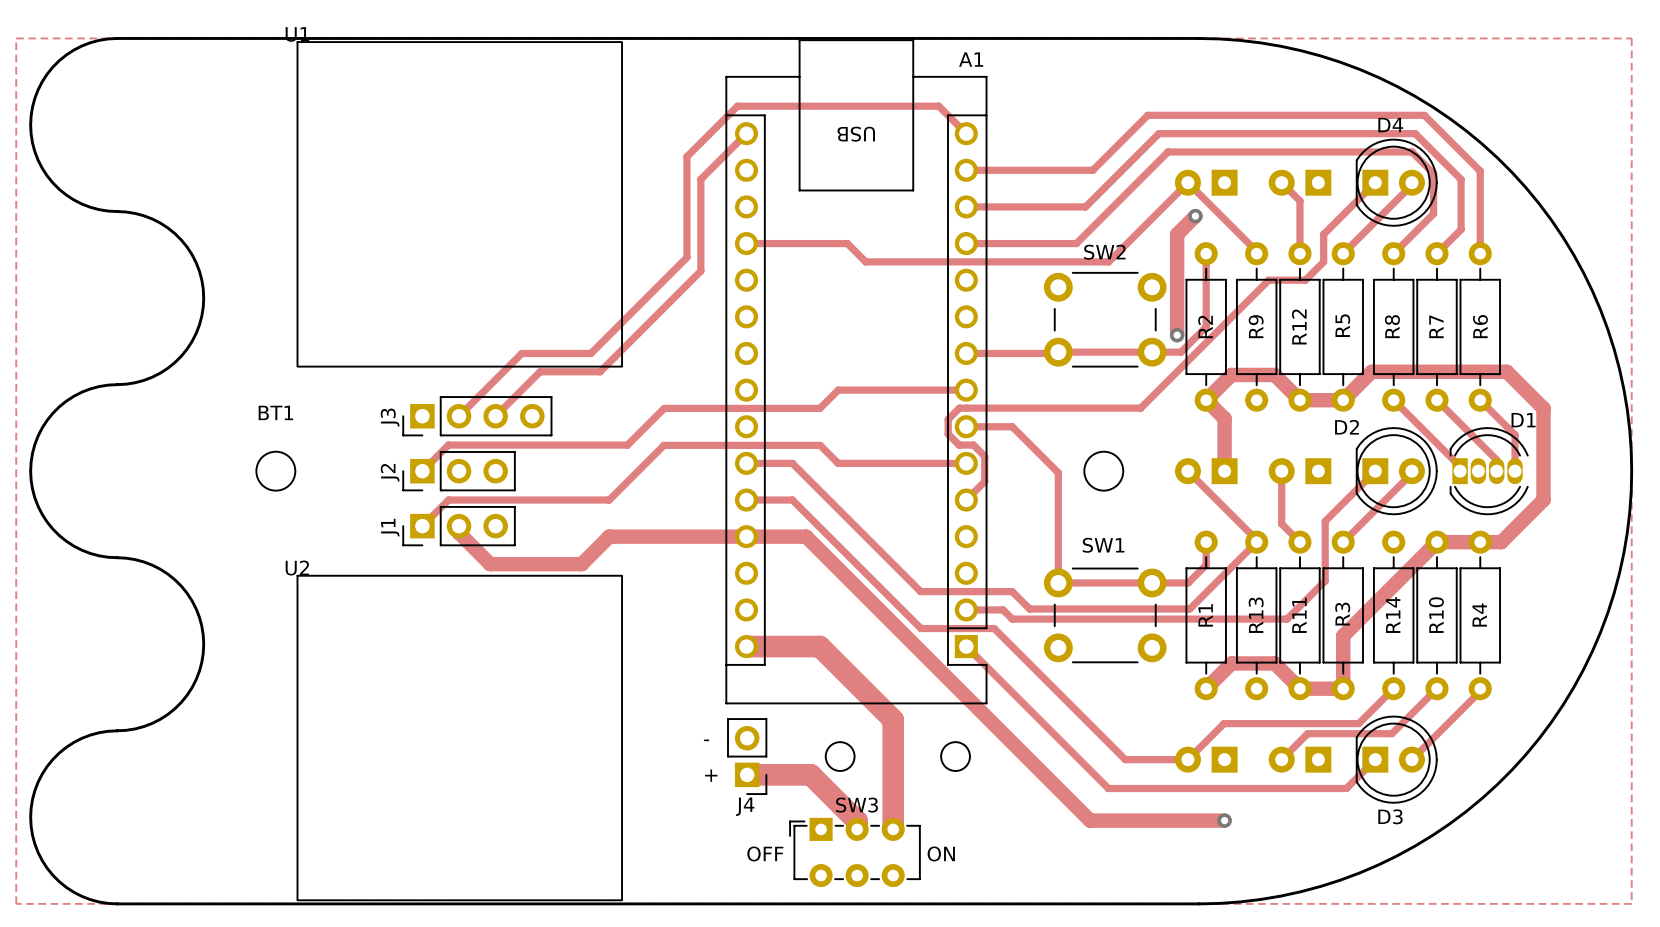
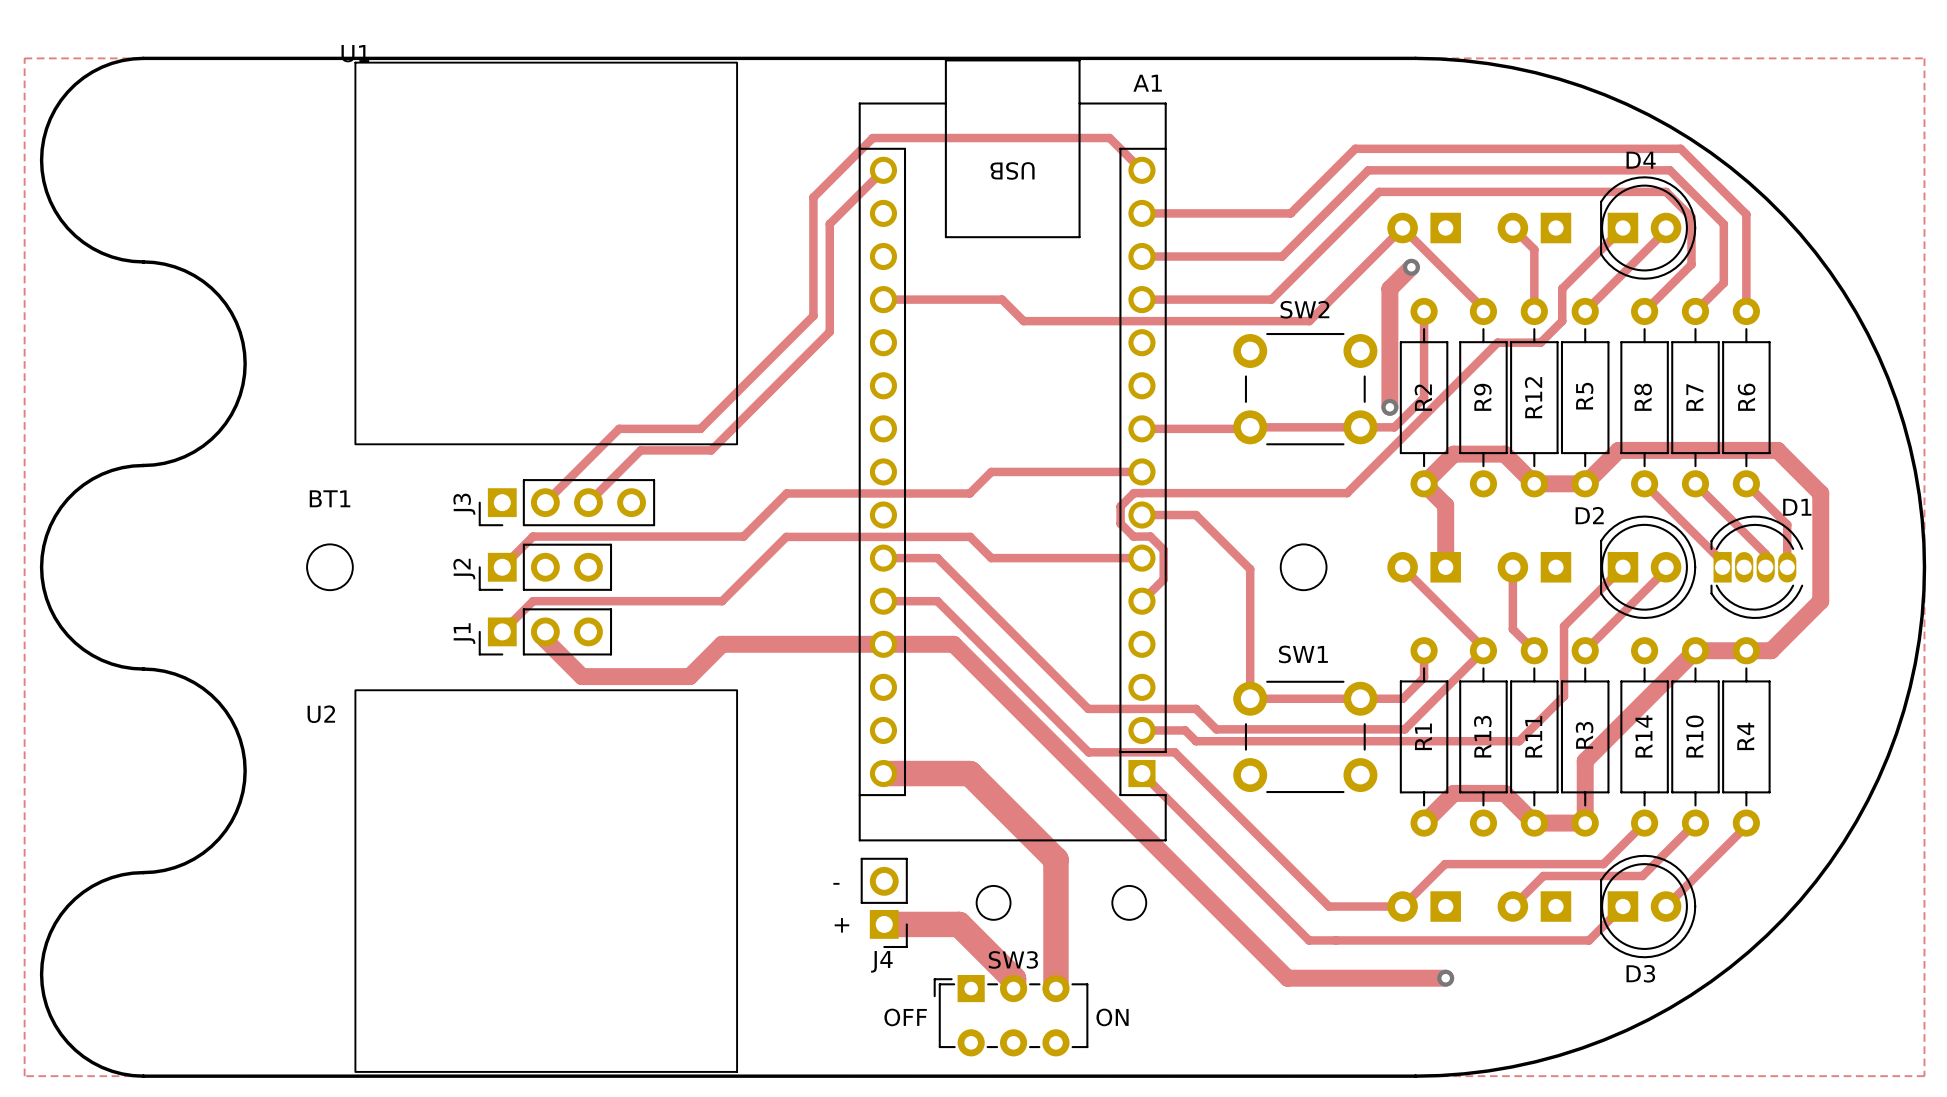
U2 name position: U2 (297, 568) -> U2 (321, 714)

